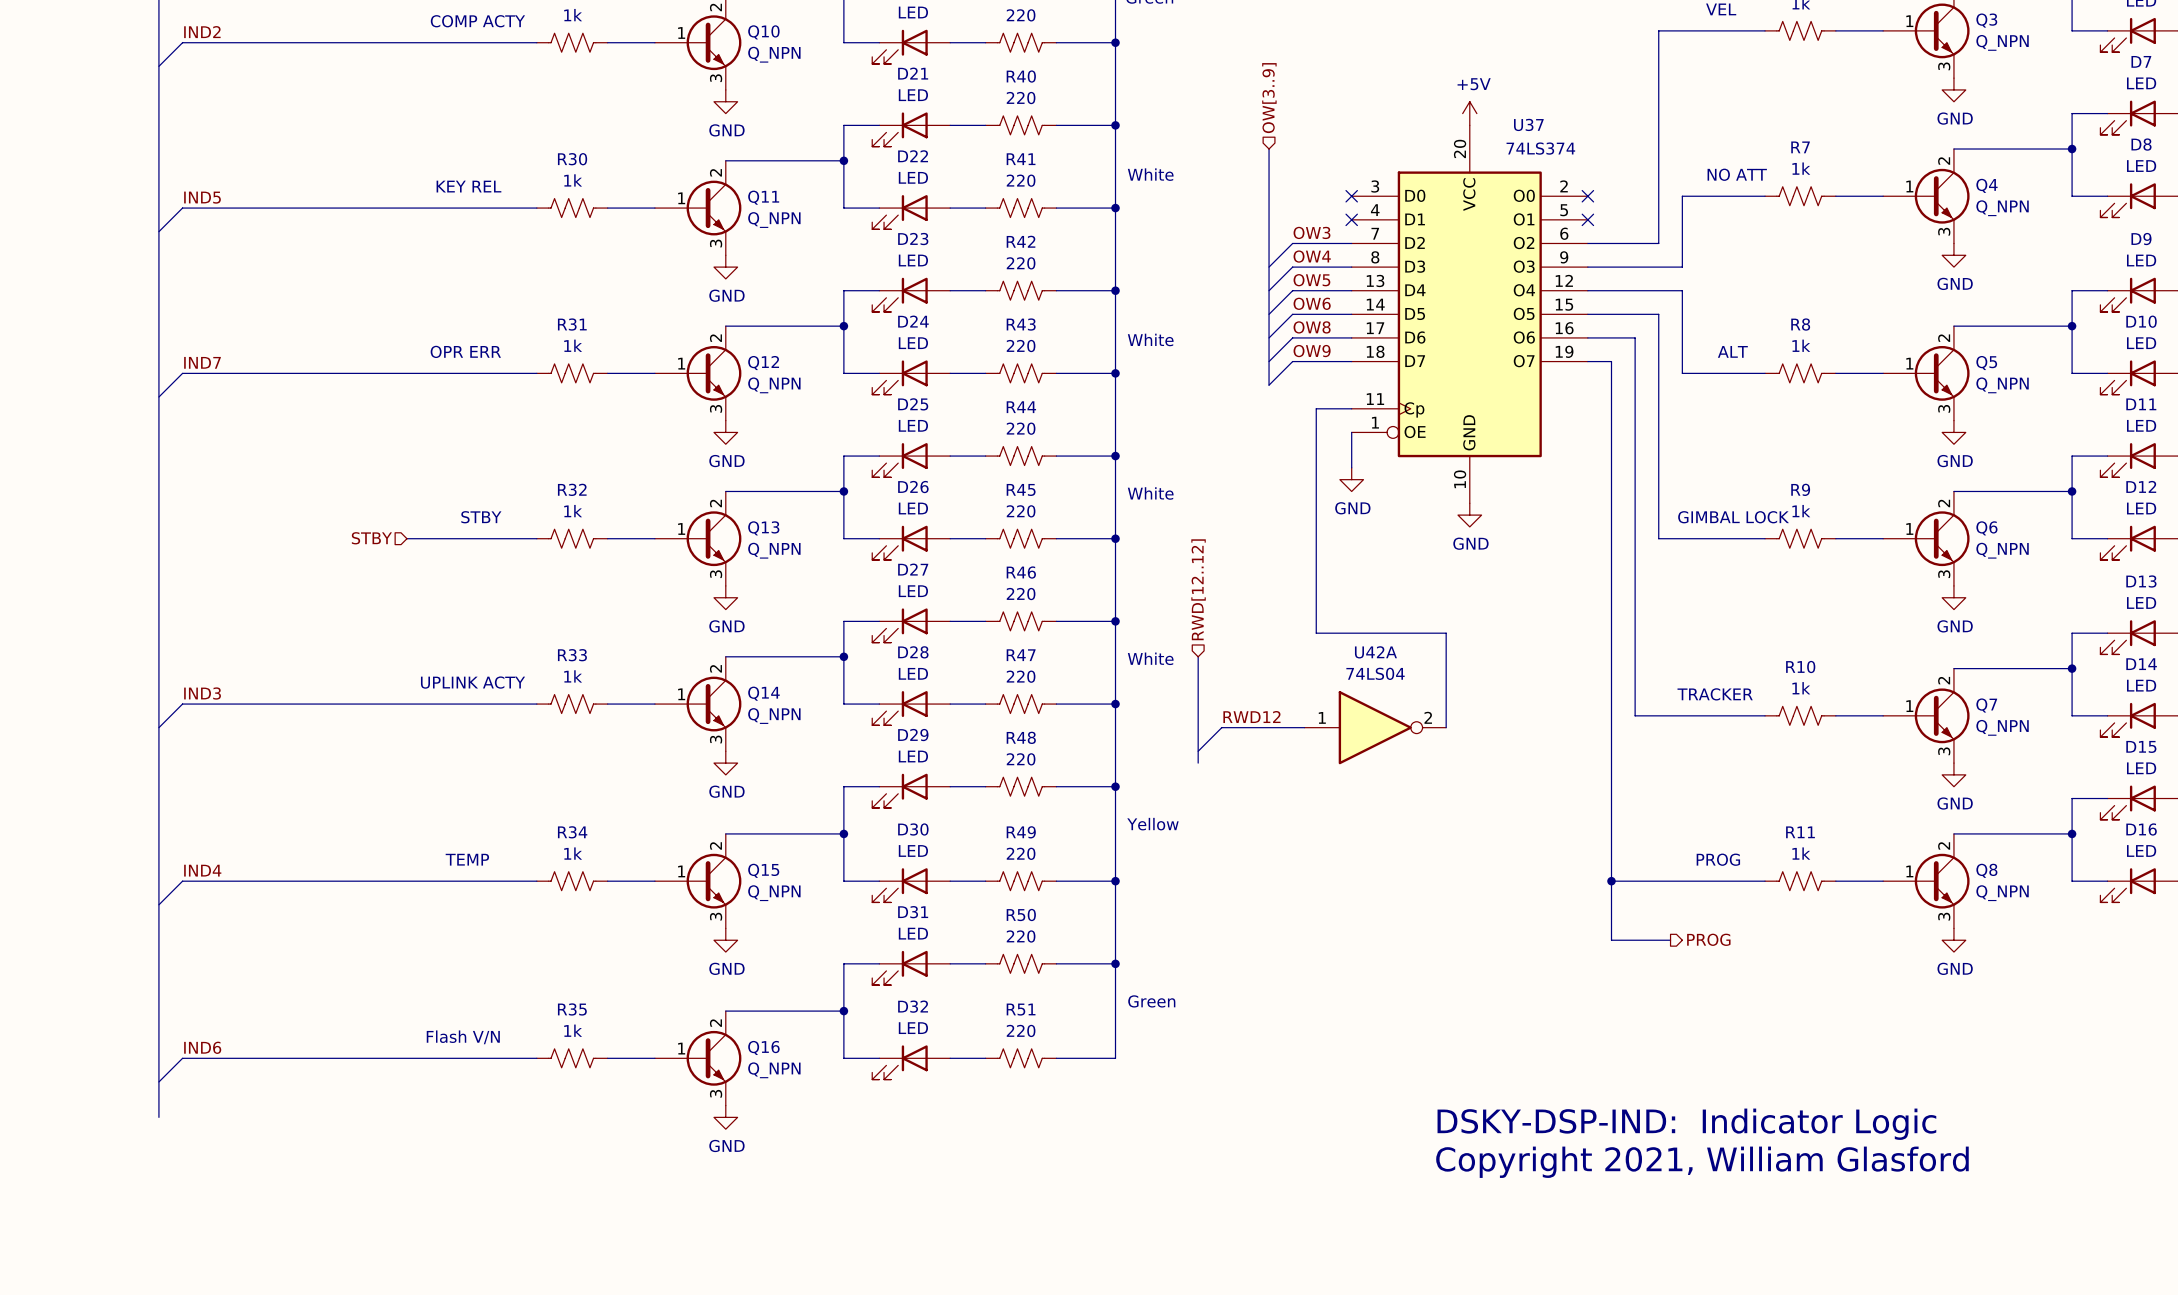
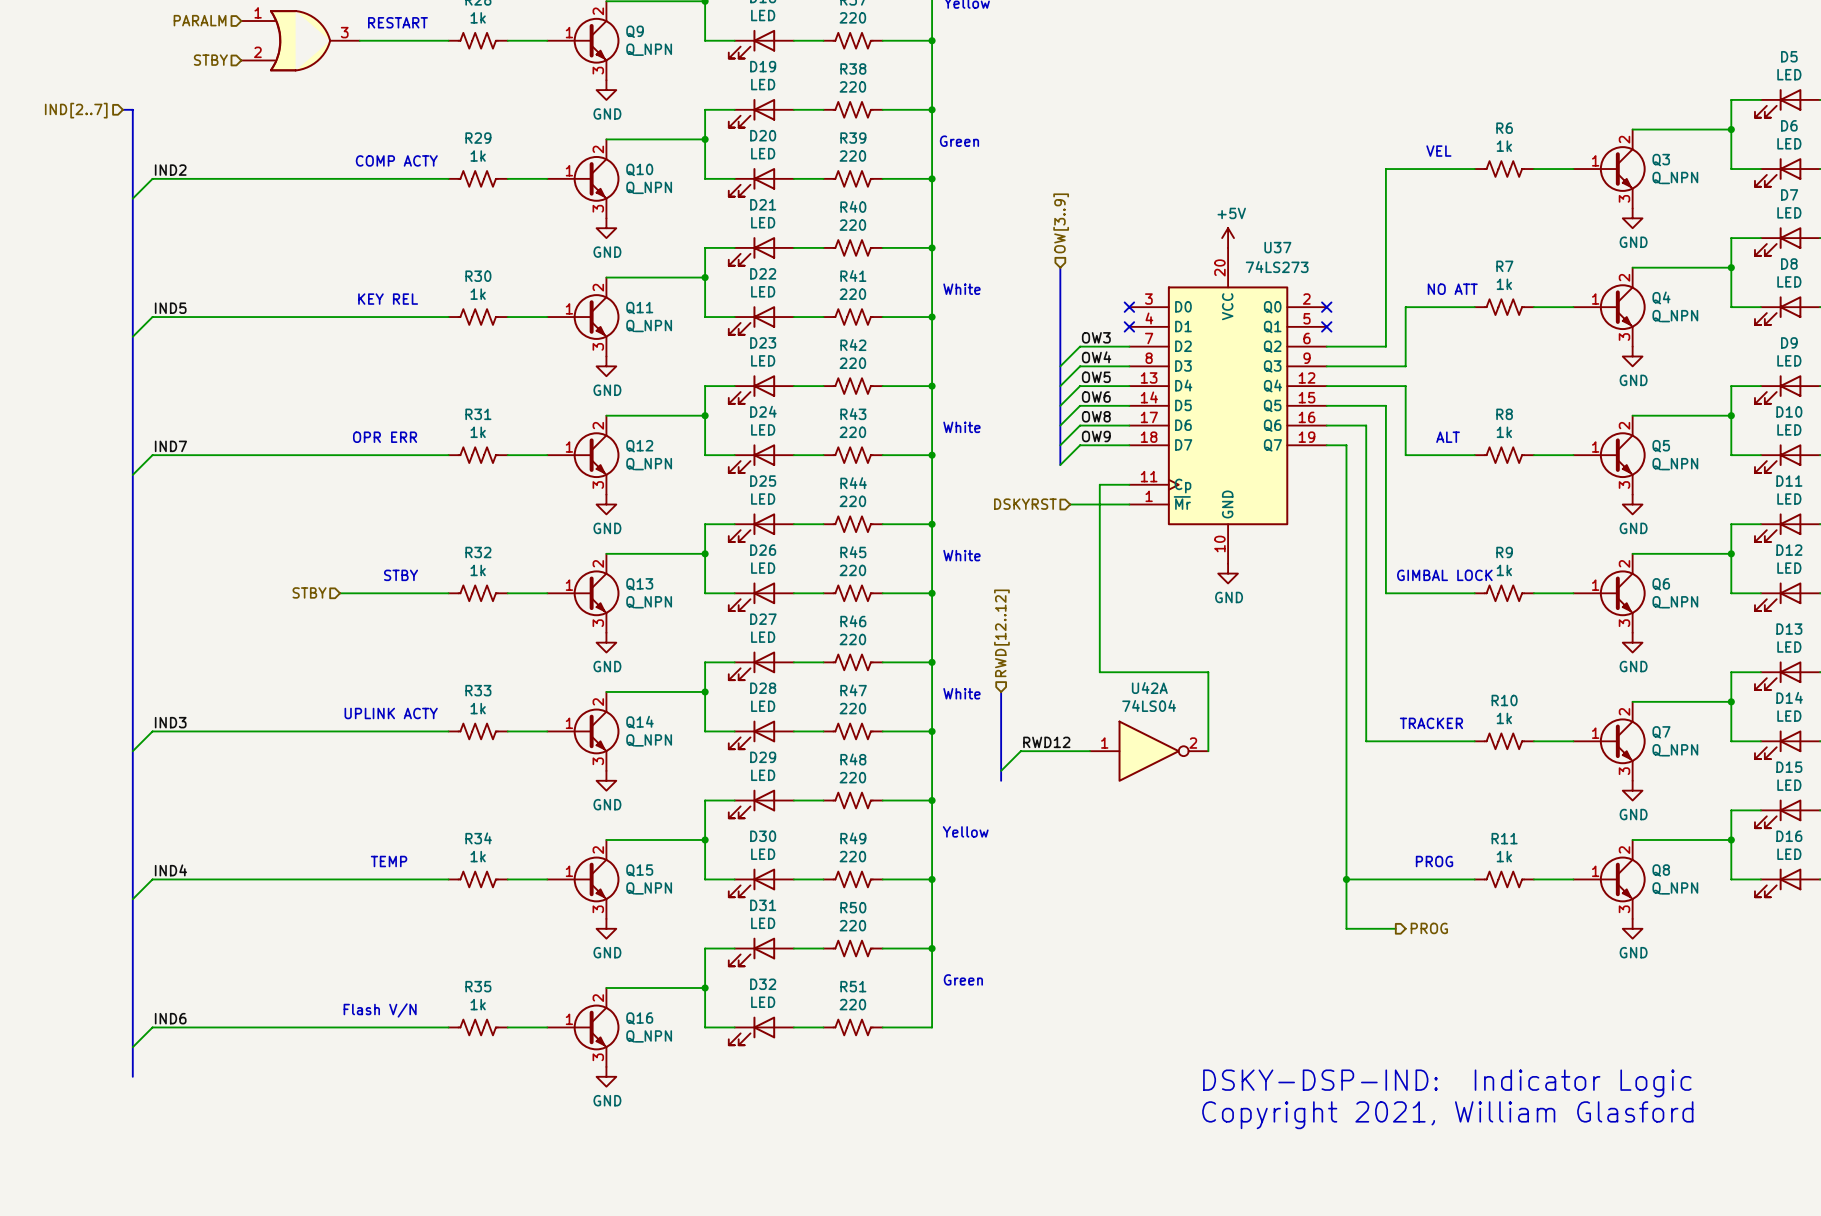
U37 symbol: [1351, 125, 1588, 504] -> [1129, 247, 1327, 564]
U37 value: 74LS374 (1540, 148) -> 74LS273 (1277, 267)
hierarchical label: none -> DSKYRST (1025, 504)
wire: (1351, 432) (1351, 467) -> (1129, 504) (1070, 504)
power symbol: GND (1351, 479) -> none

